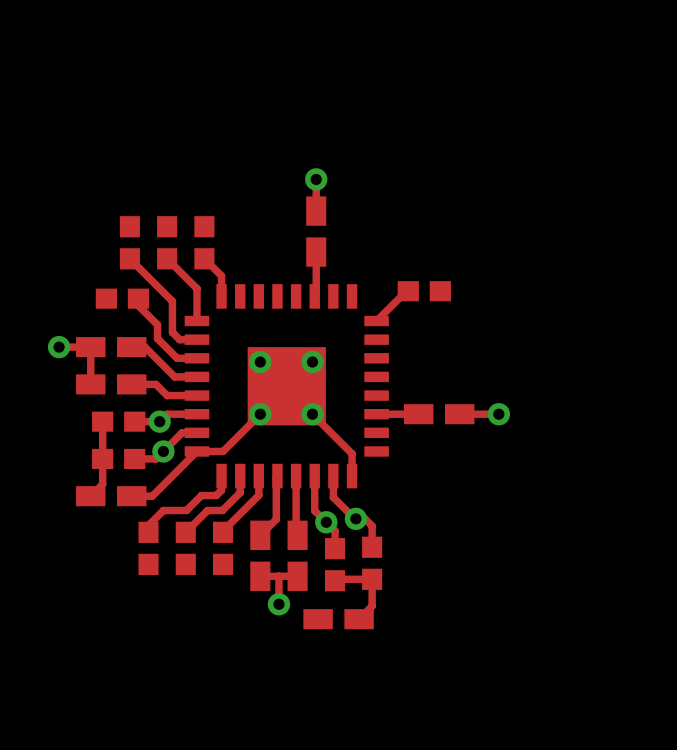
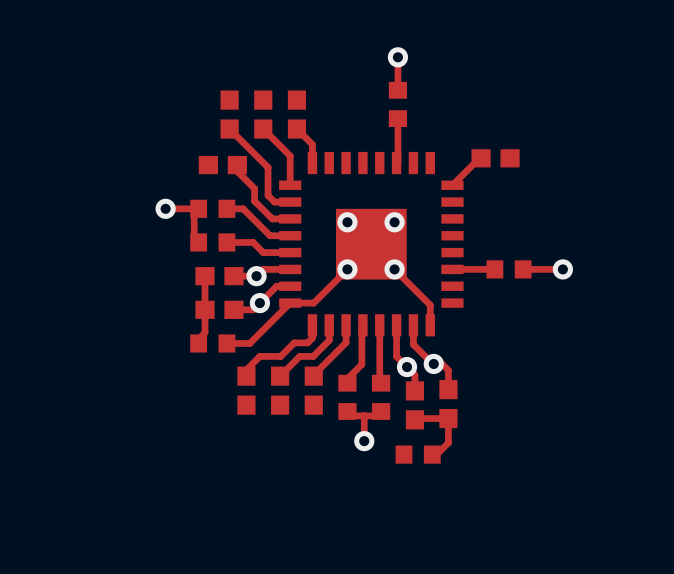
part footprint: [306, 196, 327, 267] -> [388, 81, 408, 128]
part footprint: [76, 337, 147, 358] -> [190, 199, 236, 218]
part footprint: [76, 374, 147, 395] -> [190, 233, 236, 252]
part footprint: [404, 404, 475, 425] -> [486, 260, 532, 279]
part footprint: [76, 486, 147, 507] -> [190, 334, 236, 353]
part footprint: [250, 520, 271, 592] -> [338, 374, 357, 420]
part footprint: [287, 520, 308, 592] -> [372, 374, 391, 420]
part footprint: [303, 609, 374, 630] -> [395, 445, 441, 464]

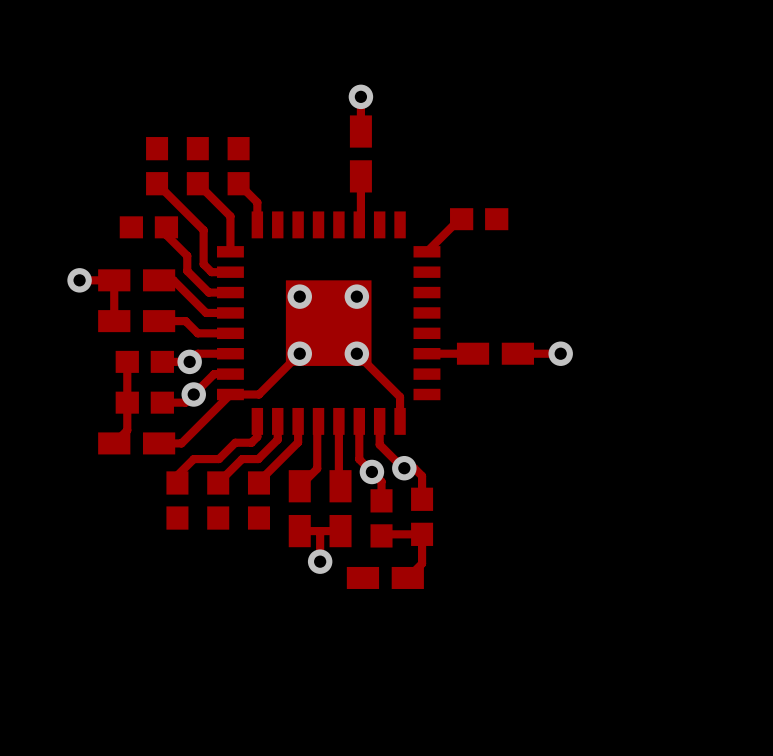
part footprint: [388, 81, 408, 128] -> [349, 115, 372, 193]
part footprint: [190, 199, 236, 218] -> [98, 269, 176, 292]
part footprint: [190, 233, 236, 252] -> [98, 310, 176, 333]
part footprint: [486, 260, 532, 279] -> [456, 342, 534, 365]
part footprint: [190, 334, 236, 353] -> [98, 432, 176, 455]
part footprint: [338, 374, 357, 420] -> [288, 470, 311, 548]
part footprint: [372, 374, 391, 420] -> [329, 470, 352, 548]
part footprint: [395, 445, 441, 464] -> [346, 566, 424, 589]

